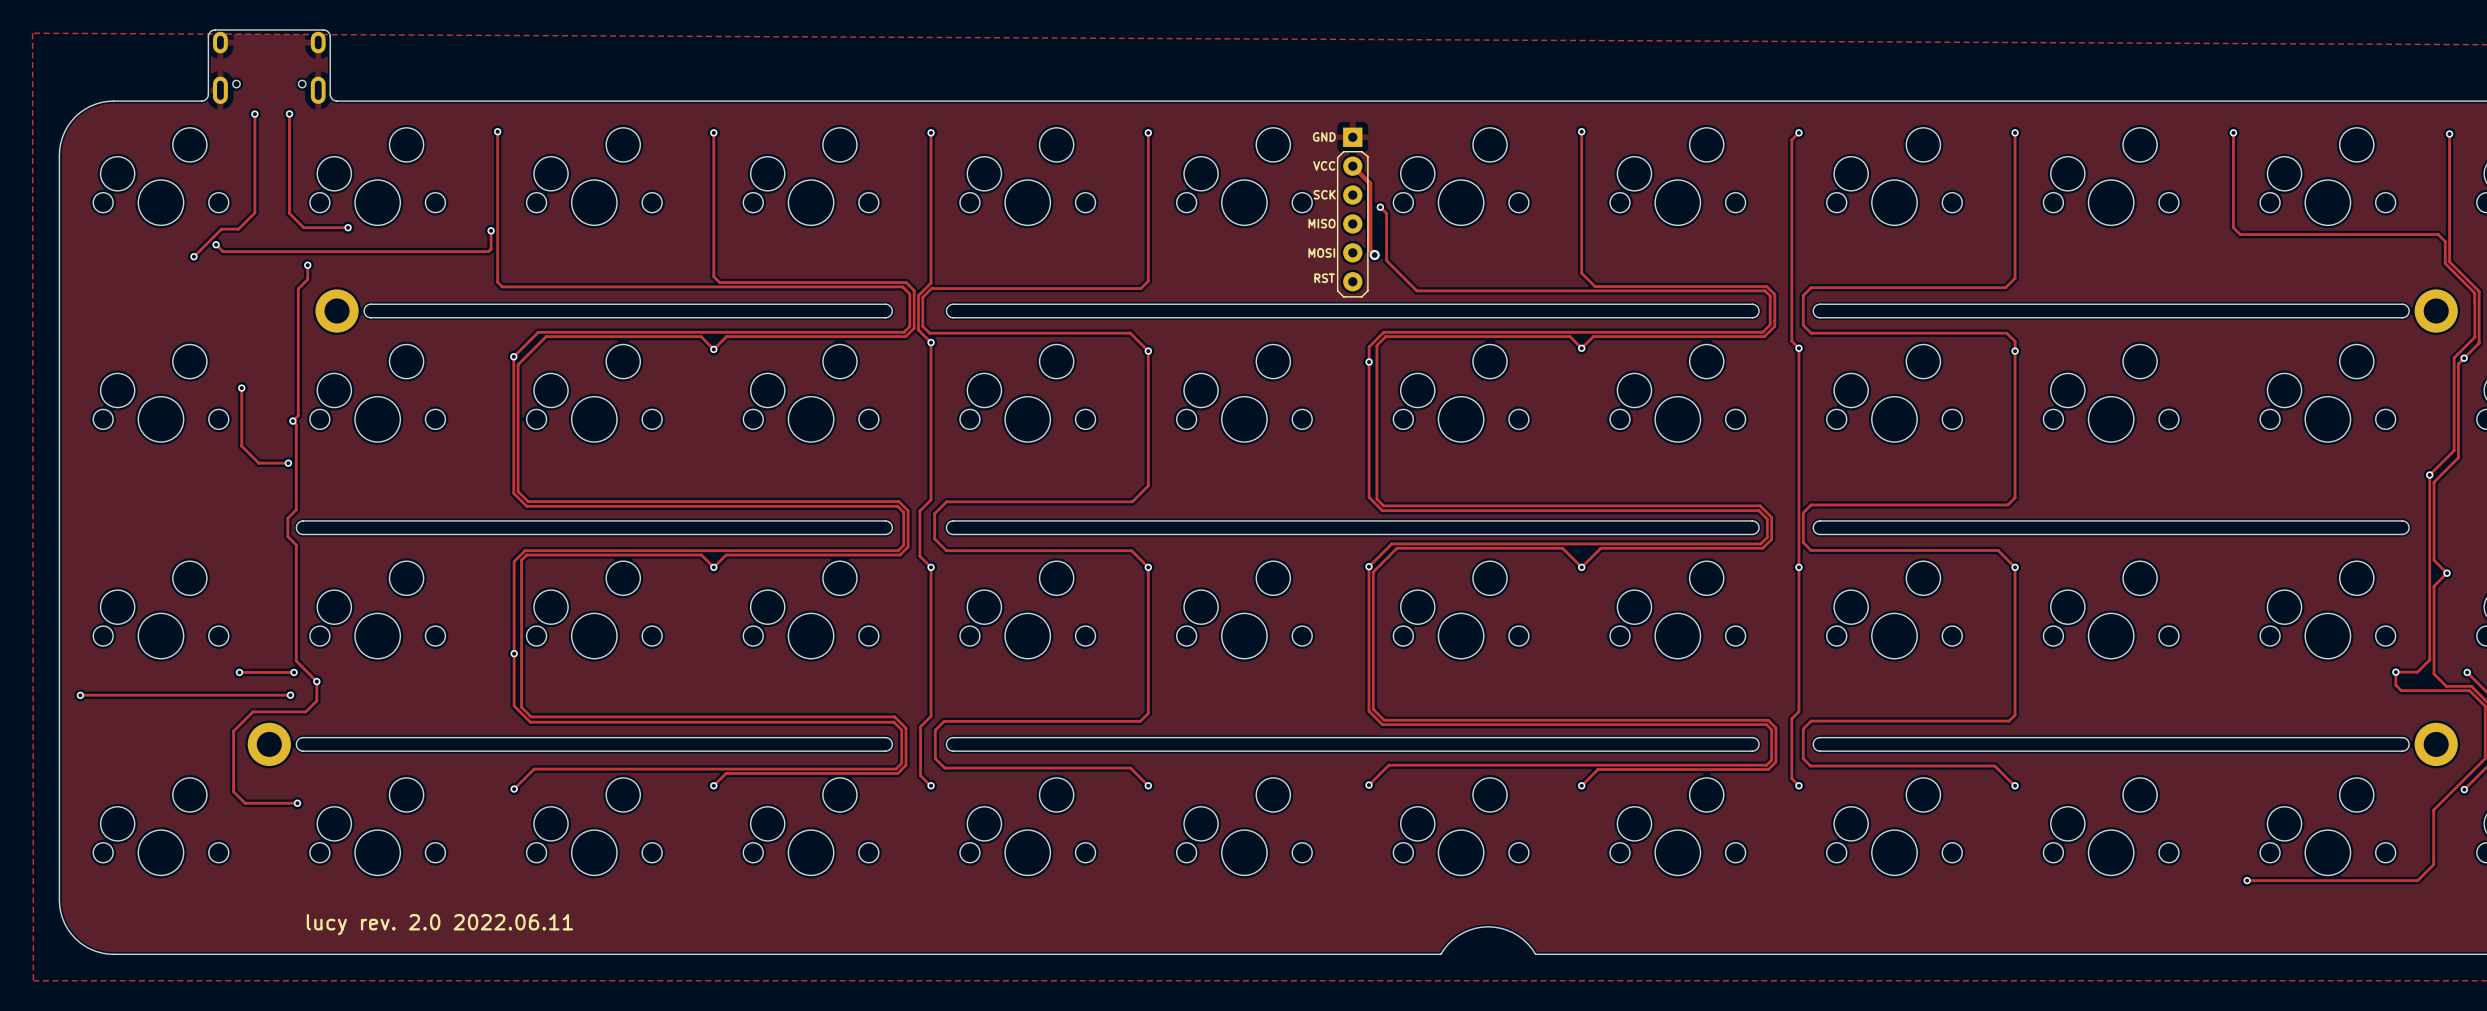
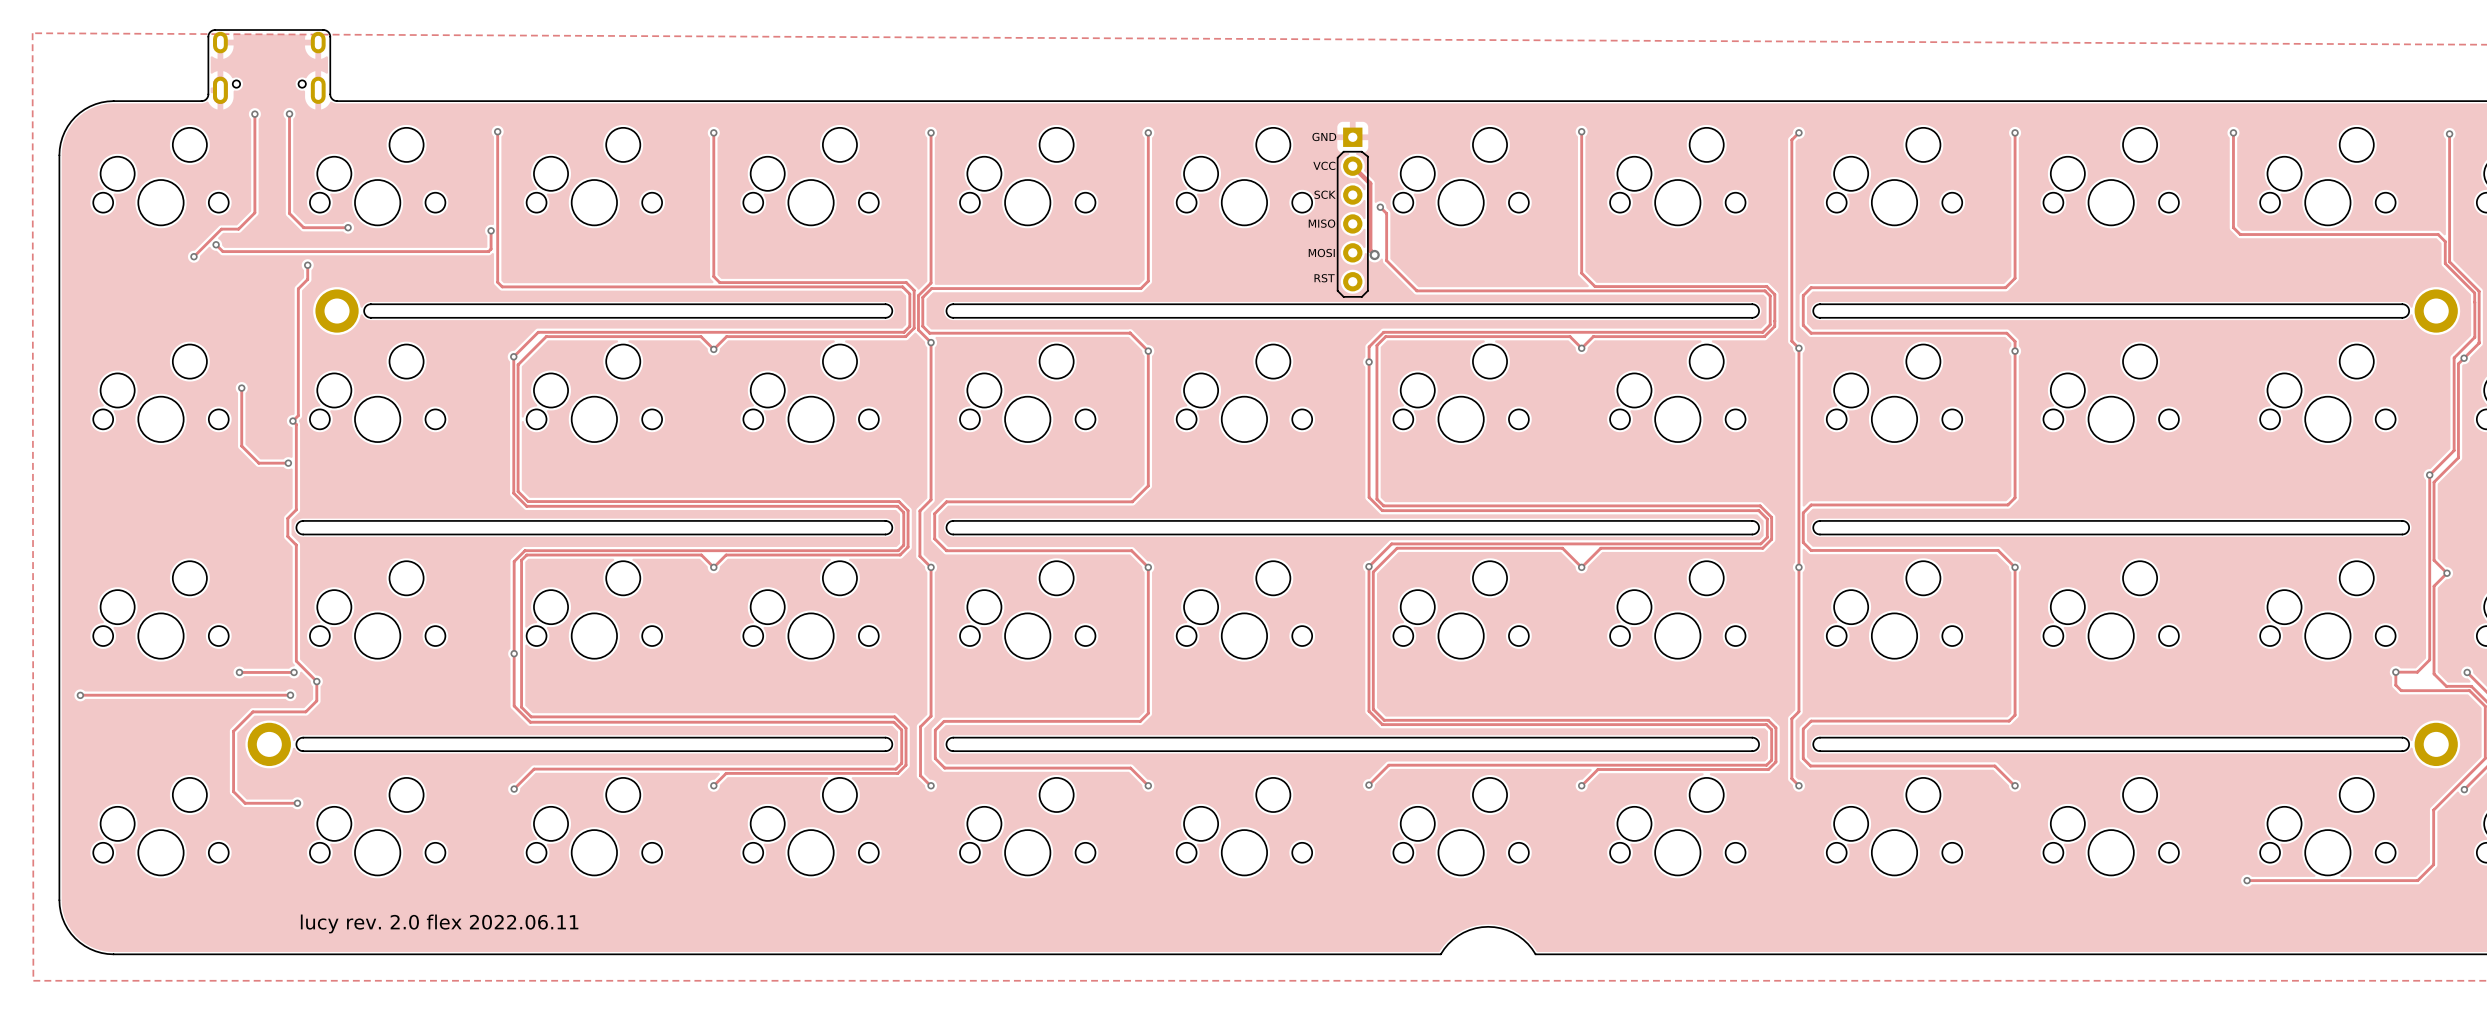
text: lucy rev. 2.0 2022.06.11 (439, 924) -> lucy rev. 2.0 flex 2022.06.11 (439, 923)

